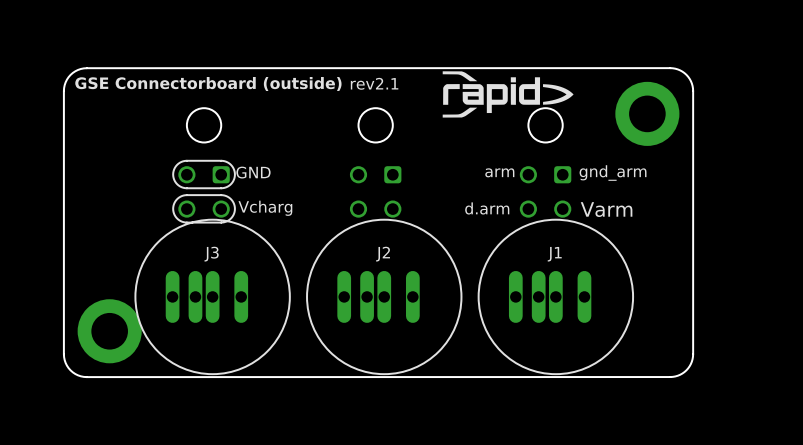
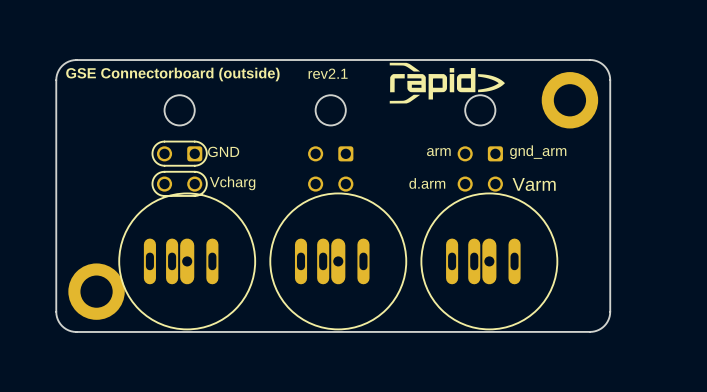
J3: (212, 296) -> none
part: none -> (187, 261)
J2: (384, 296) -> none
part: none -> (338, 261)
J1: (555, 296) -> none
part: none -> (489, 261)

